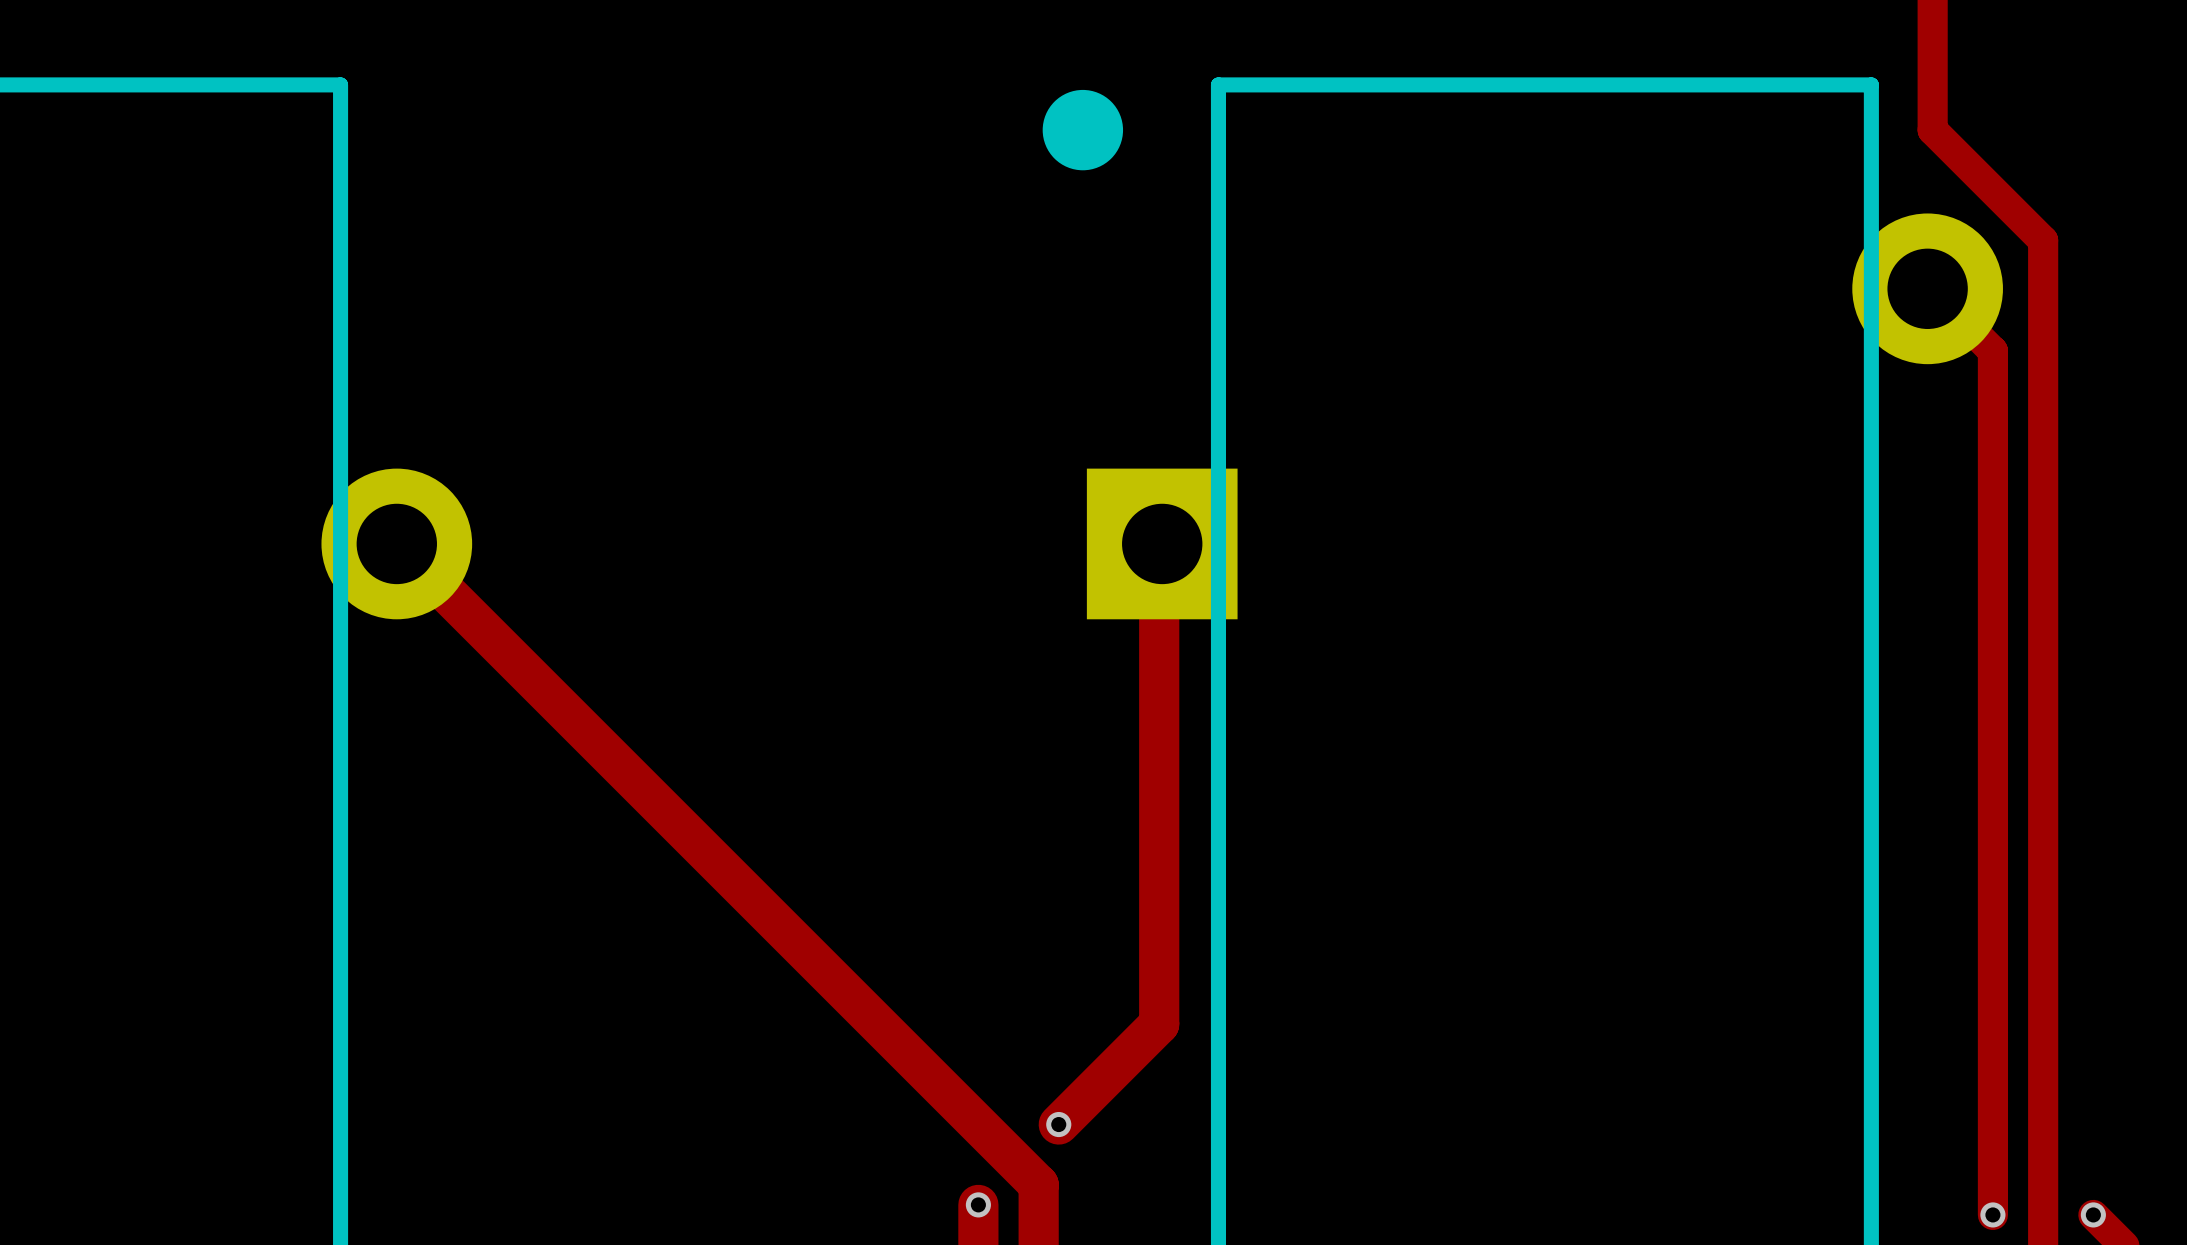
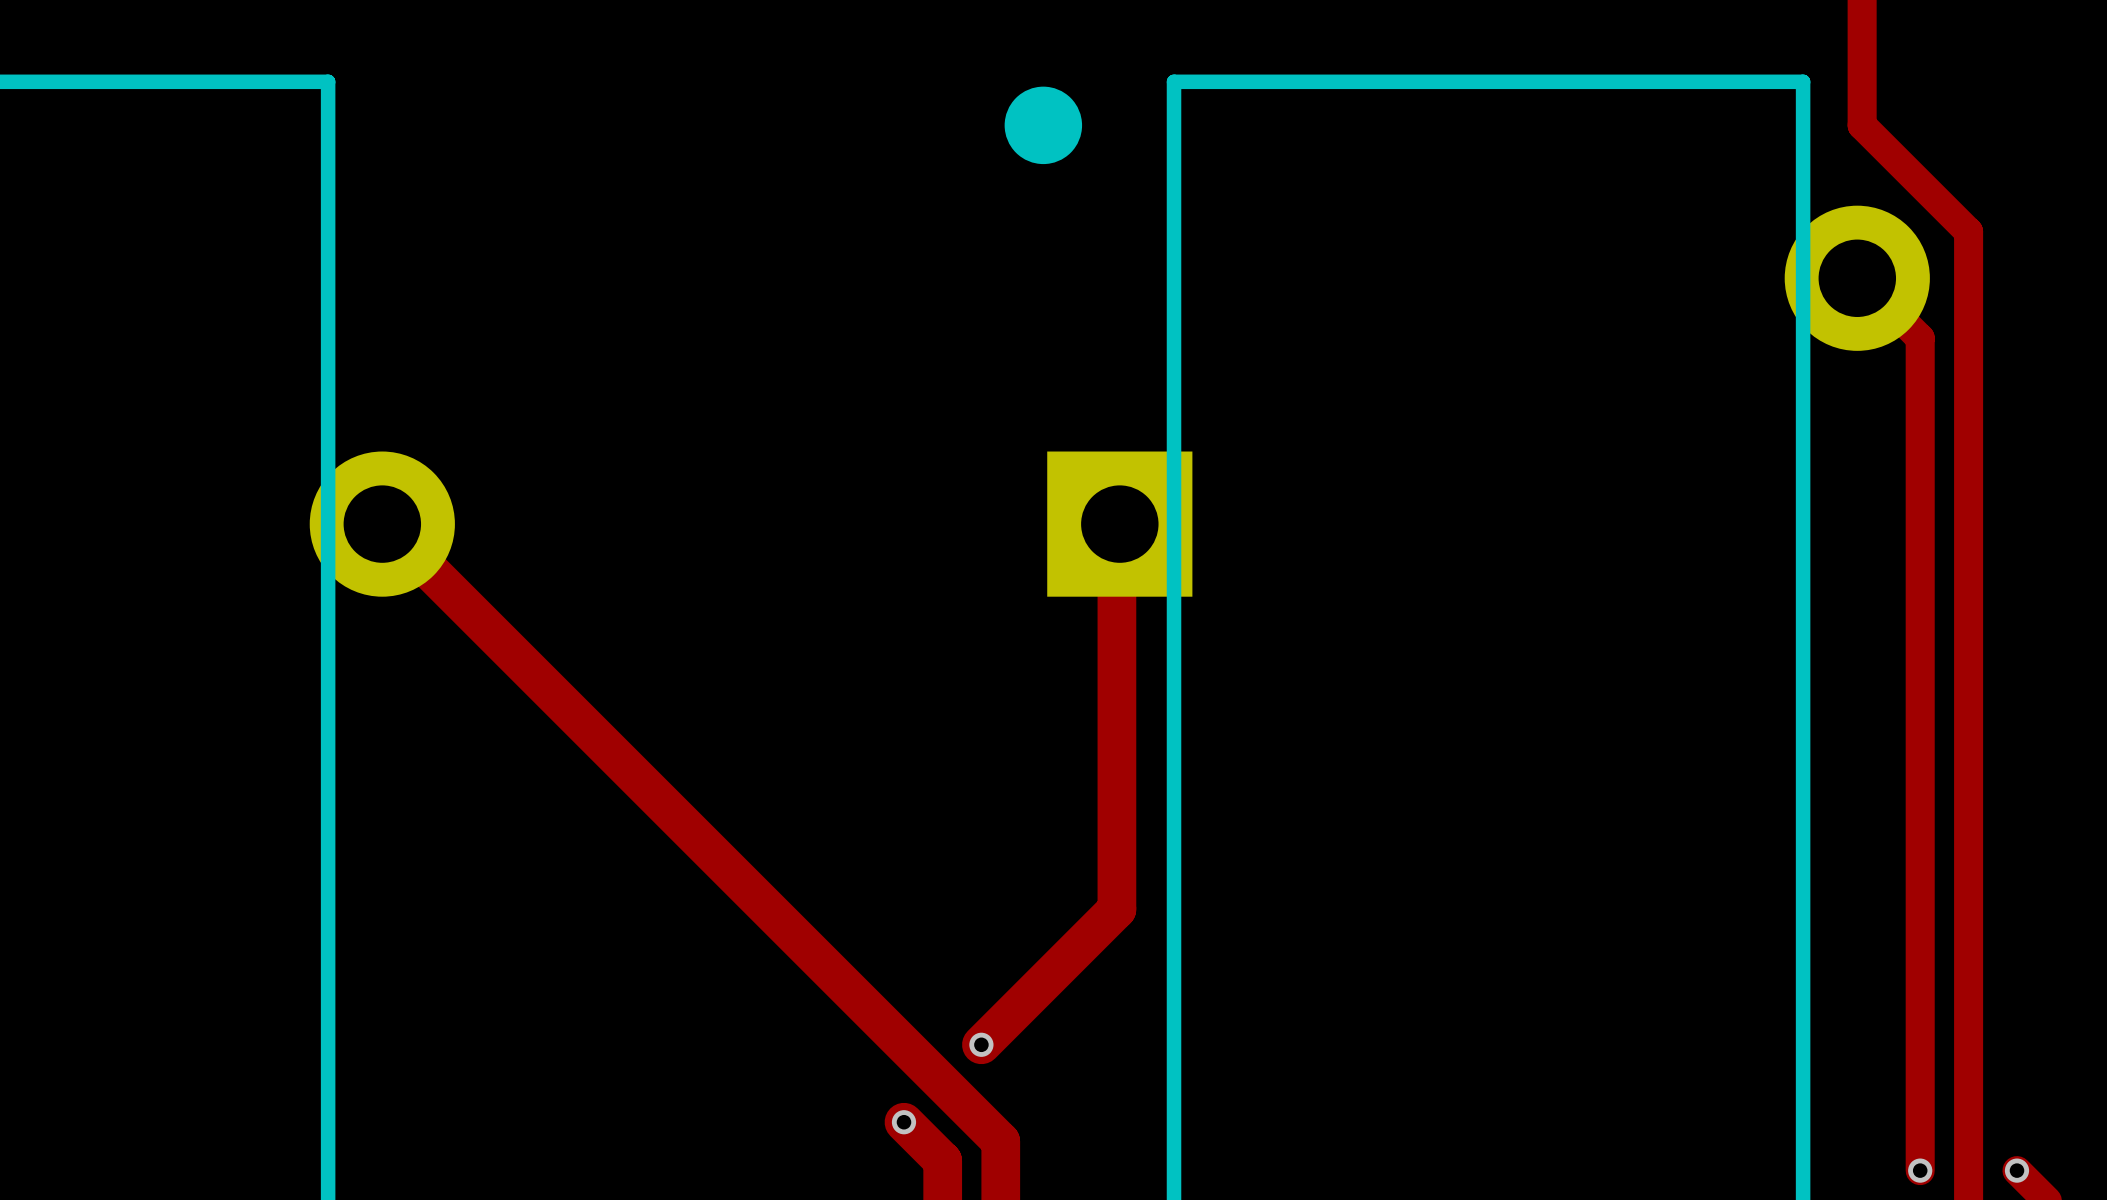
track: (1159, 943) (1159, 1024) (1058, 1124) -> (1116, 909) (981, 1044)
via position: (1058, 1124) -> (981, 1044)
track: none -> (903, 1122) (942, 1160)
via position: (978, 1204) -> (903, 1122)

